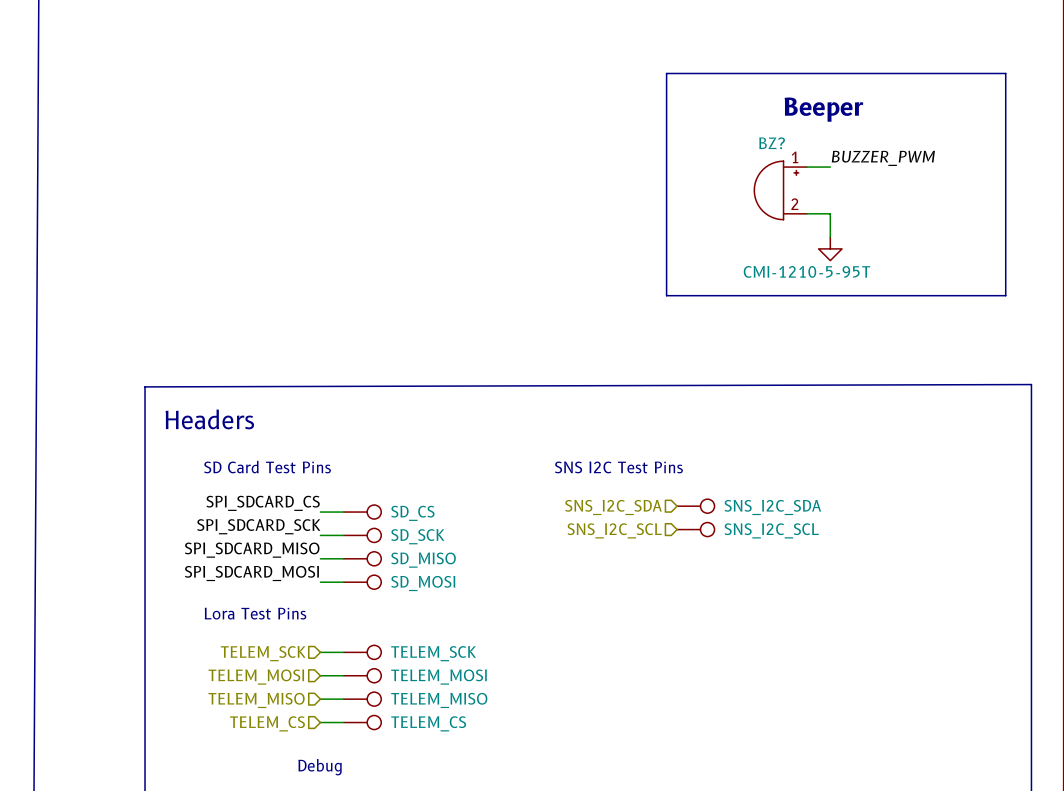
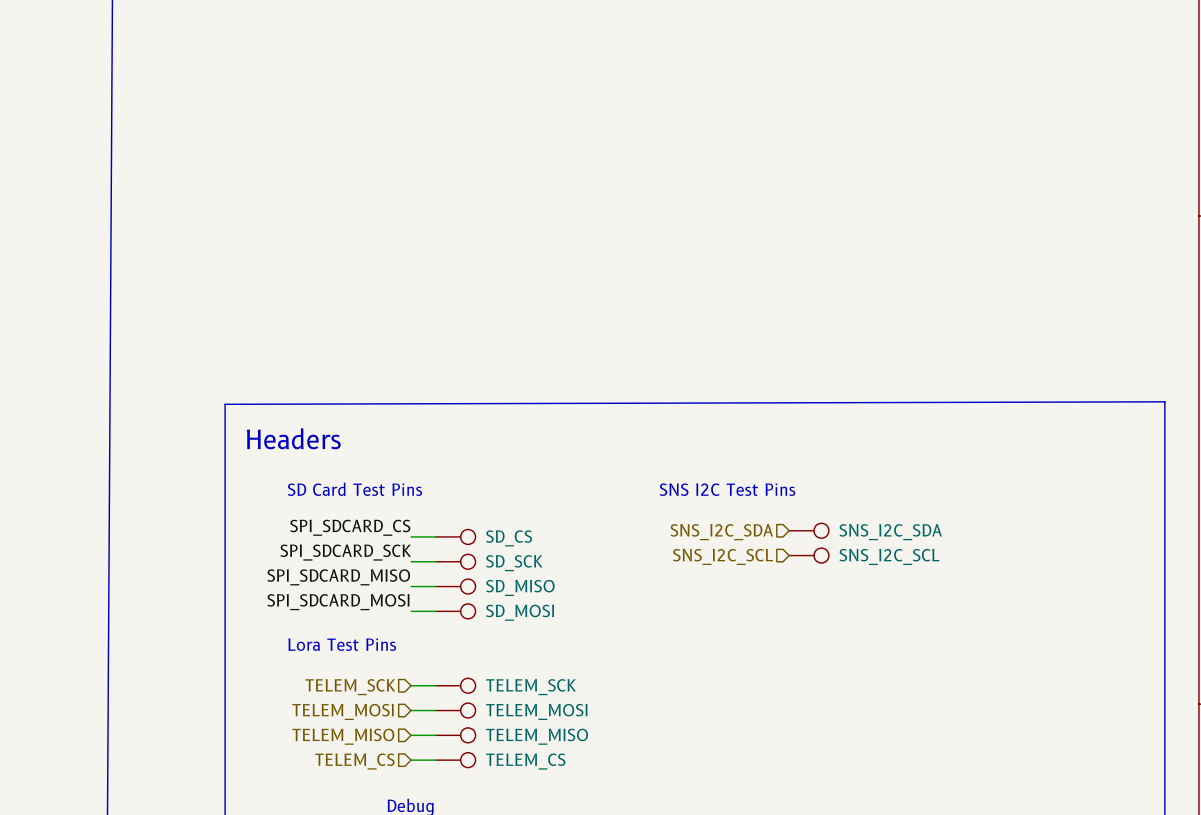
line: (666, 73) (666, 295) (1005, 295) (1005, 73) (666, 73) -> none
text: Beeper (823, 109) -> none
label: BUZZER_PWM (883, 158) -> none
wire: (806, 167) (830, 167) -> none
BZ?: CMI-1210-5-95T (780, 190) -> none
wire: (806, 213) (830, 213) (830, 237) -> none
power symbol: (830, 248) -> none

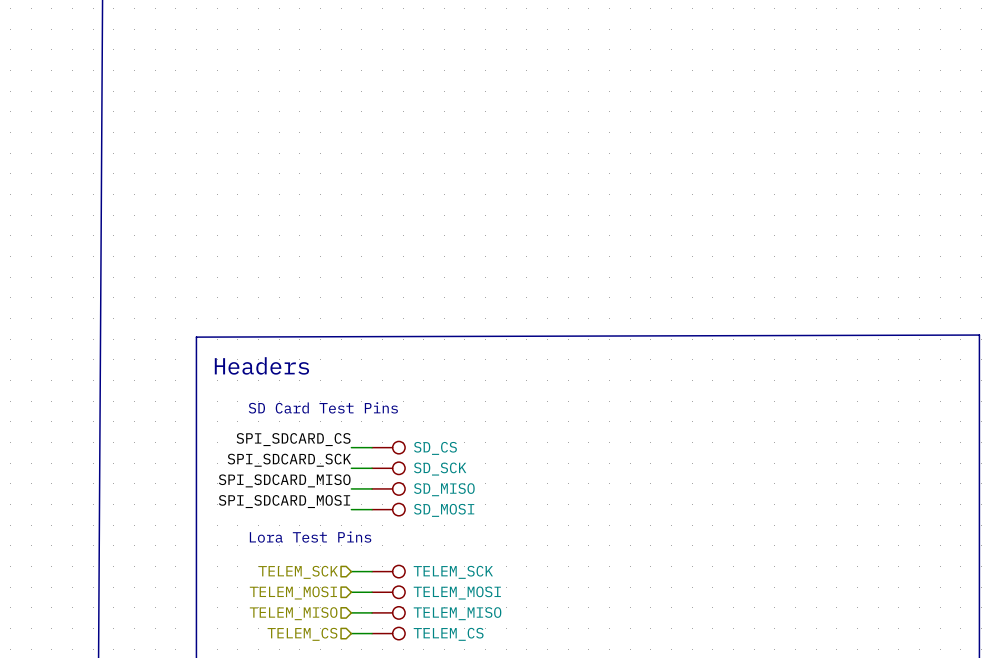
text: SNS I2C Test Pins (727, 489) -> none
SNS_I2C_SDA: (809, 530) -> none
hierarchical label: SNS_I2C_SDA (721, 532) -> none
SNS_I2C_SCL: (809, 555) -> none
hierarchical label: SNS_I2C_SCL (722, 556) -> none

